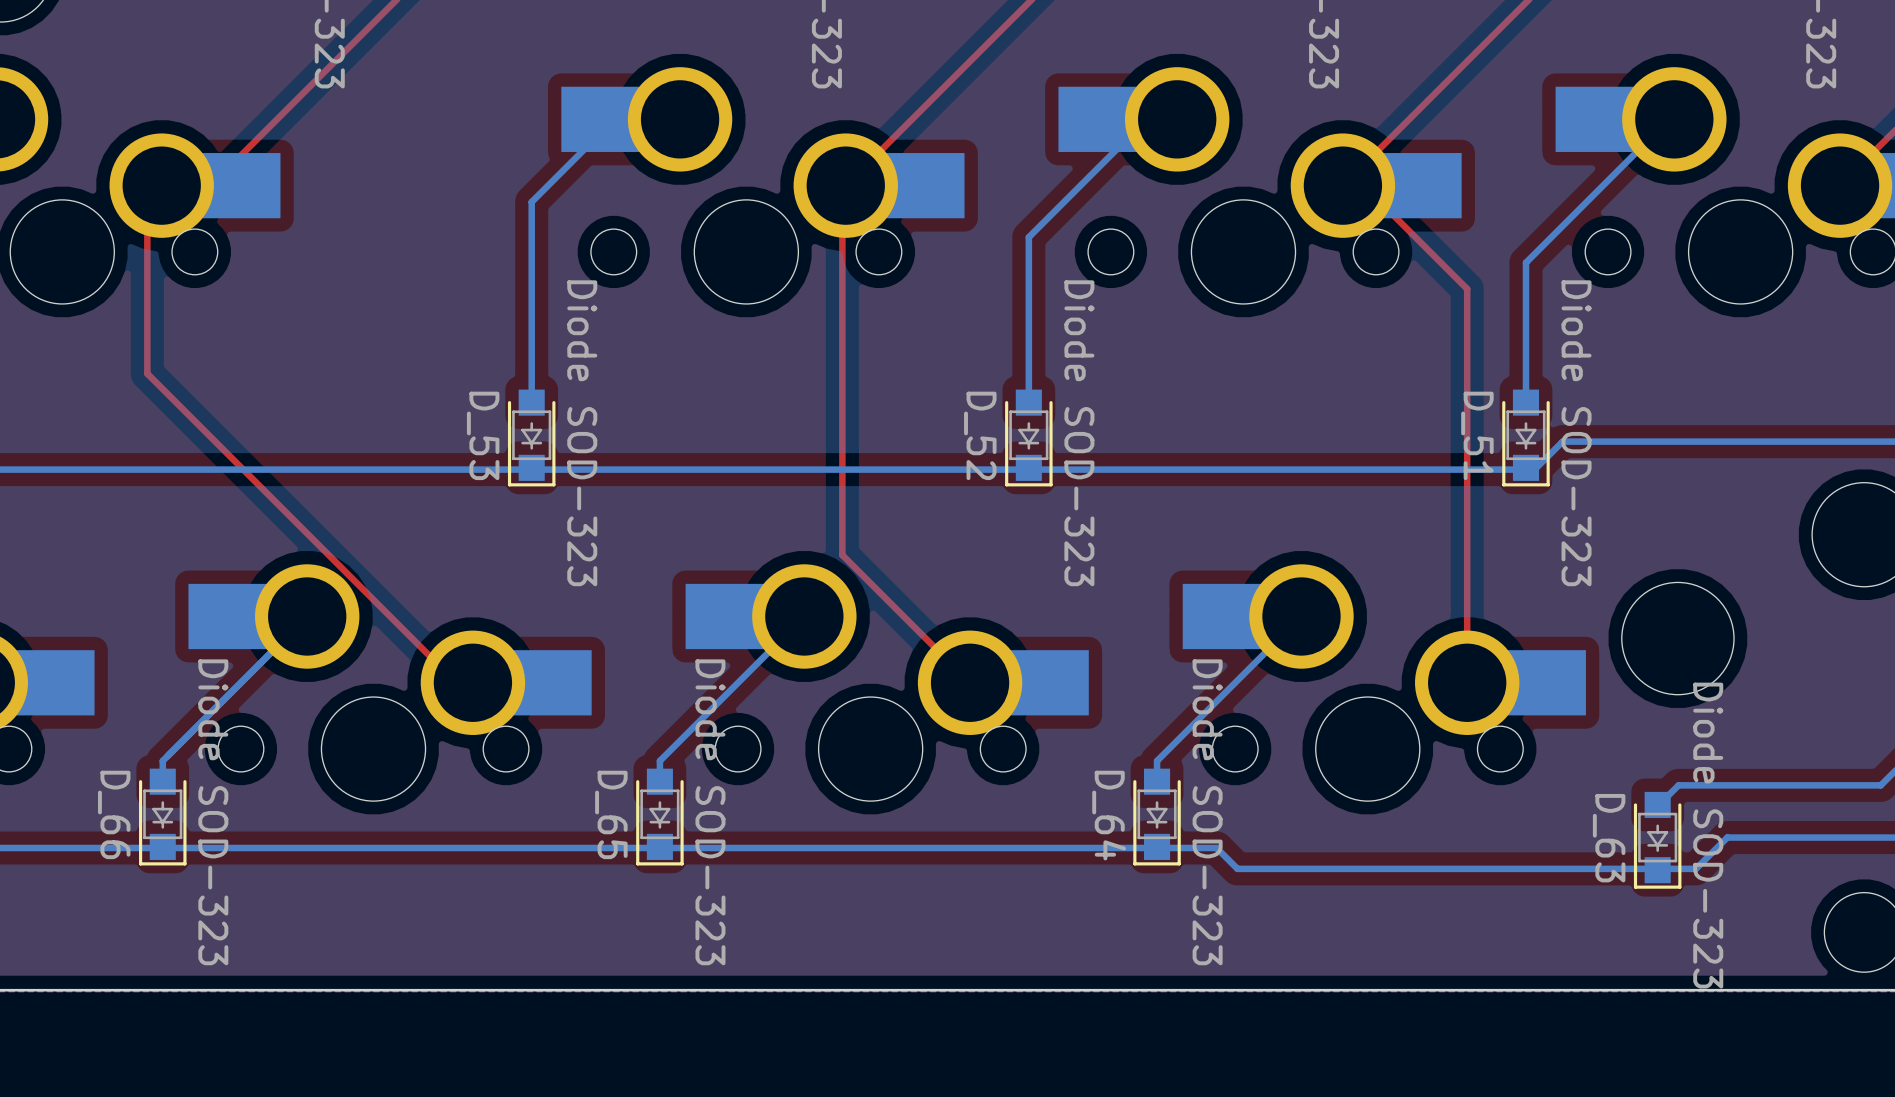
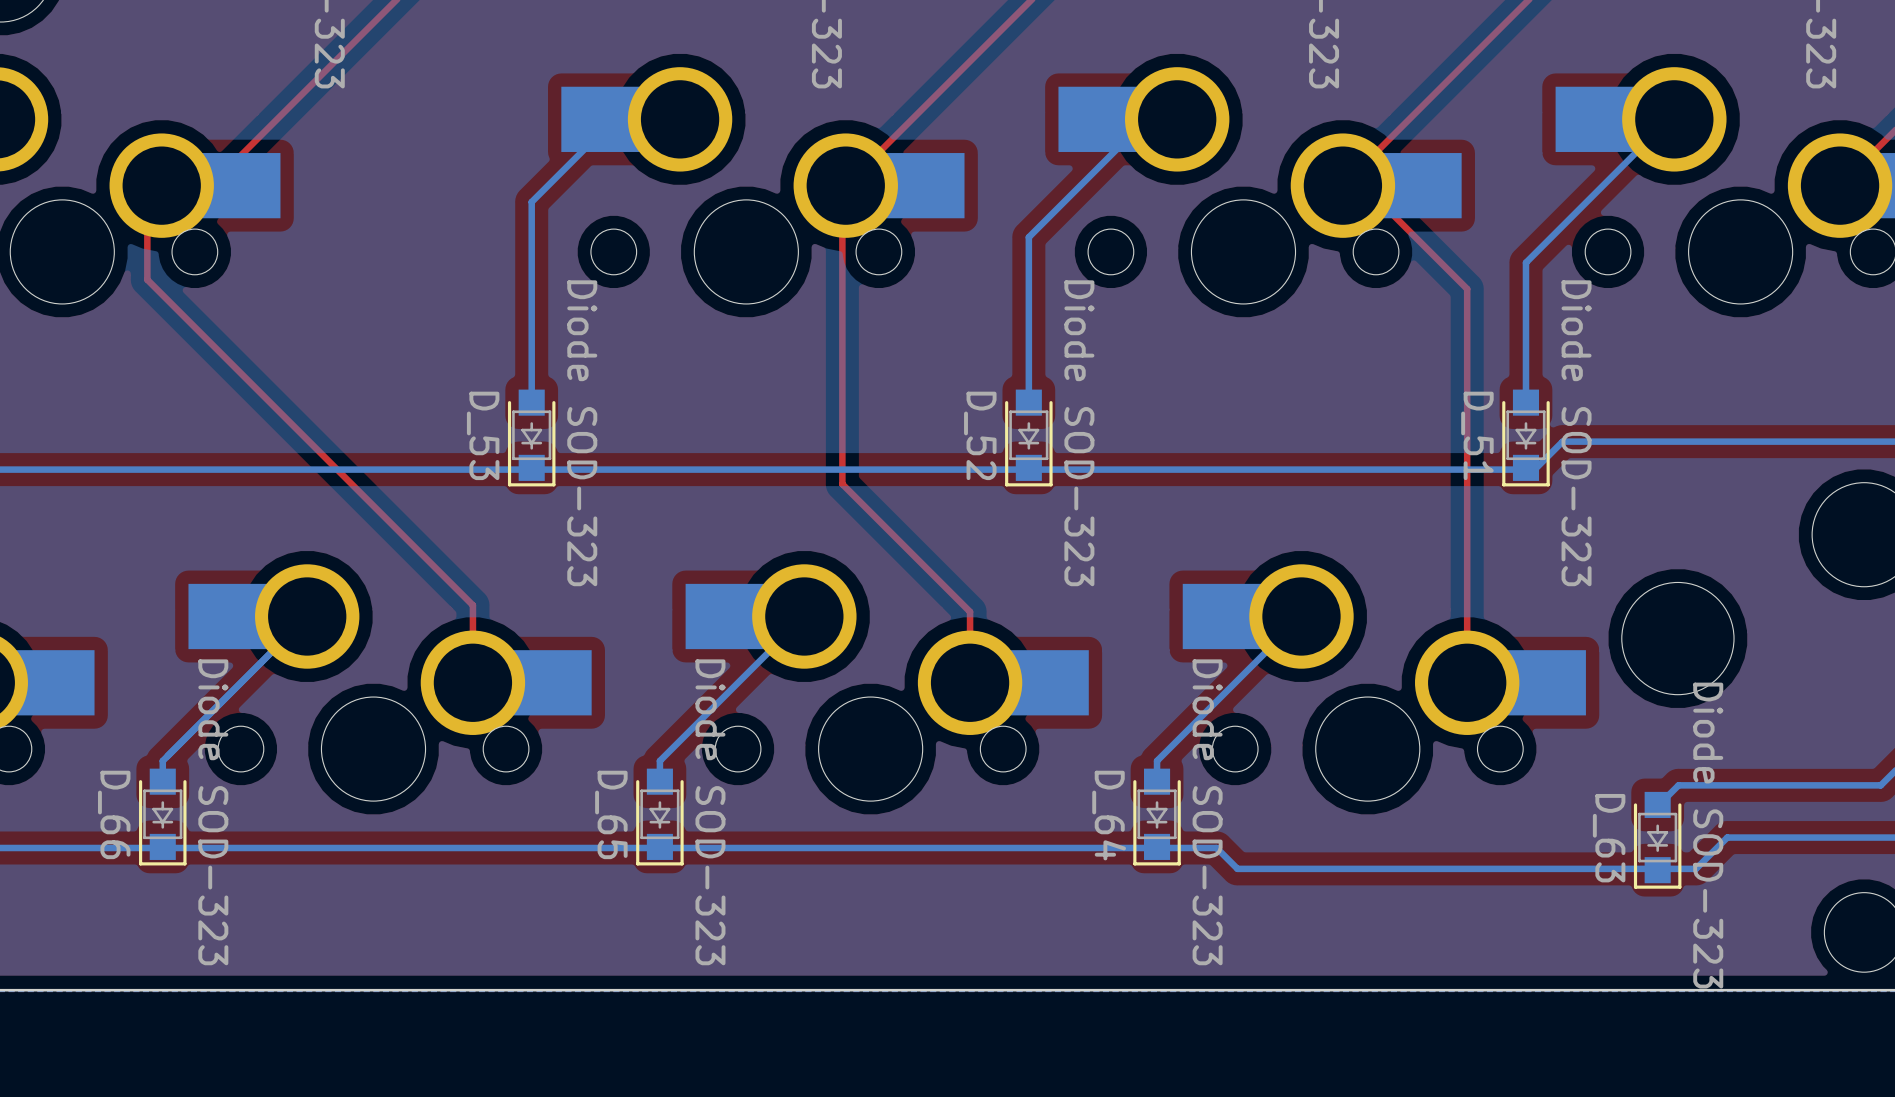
top track: (147, 279) (147, 373) (456, 682) (472, 682) -> (147, 279) (472, 605) (472, 682)
top track: (842, 484) (842, 555) (970, 682) -> (842, 484) (970, 611) (970, 682)

